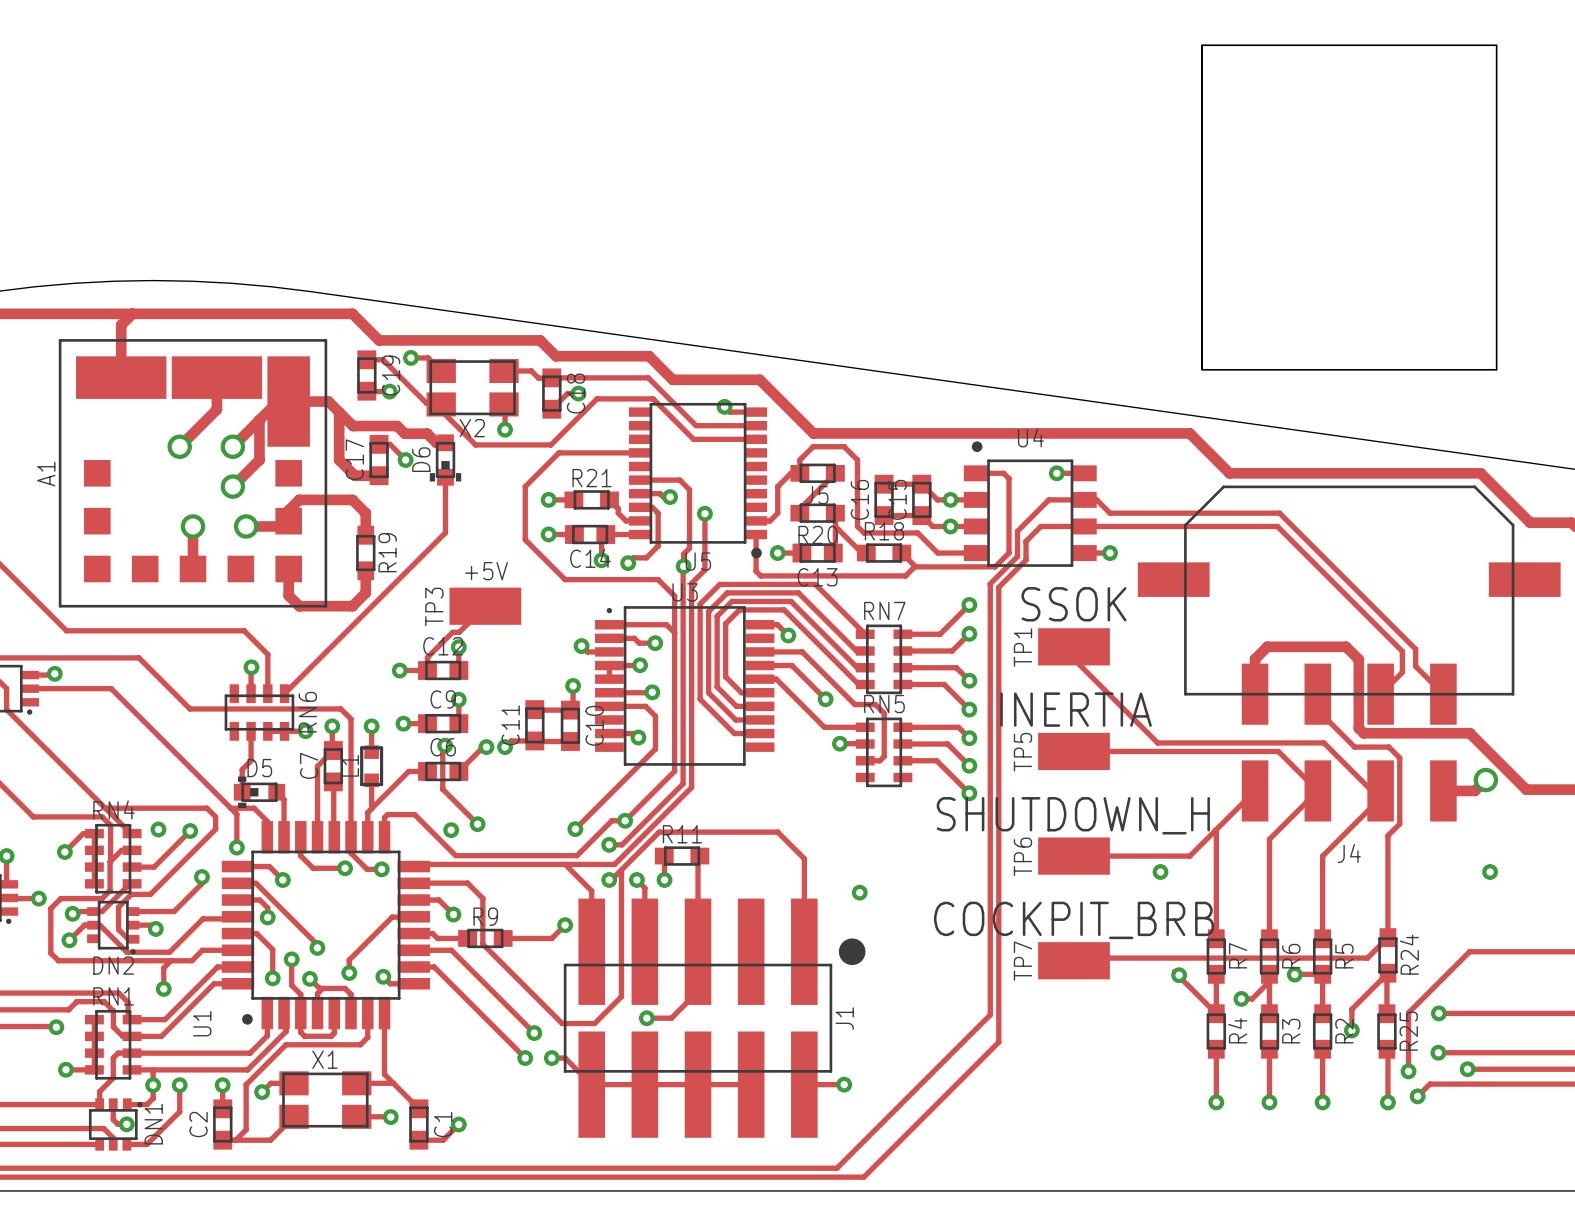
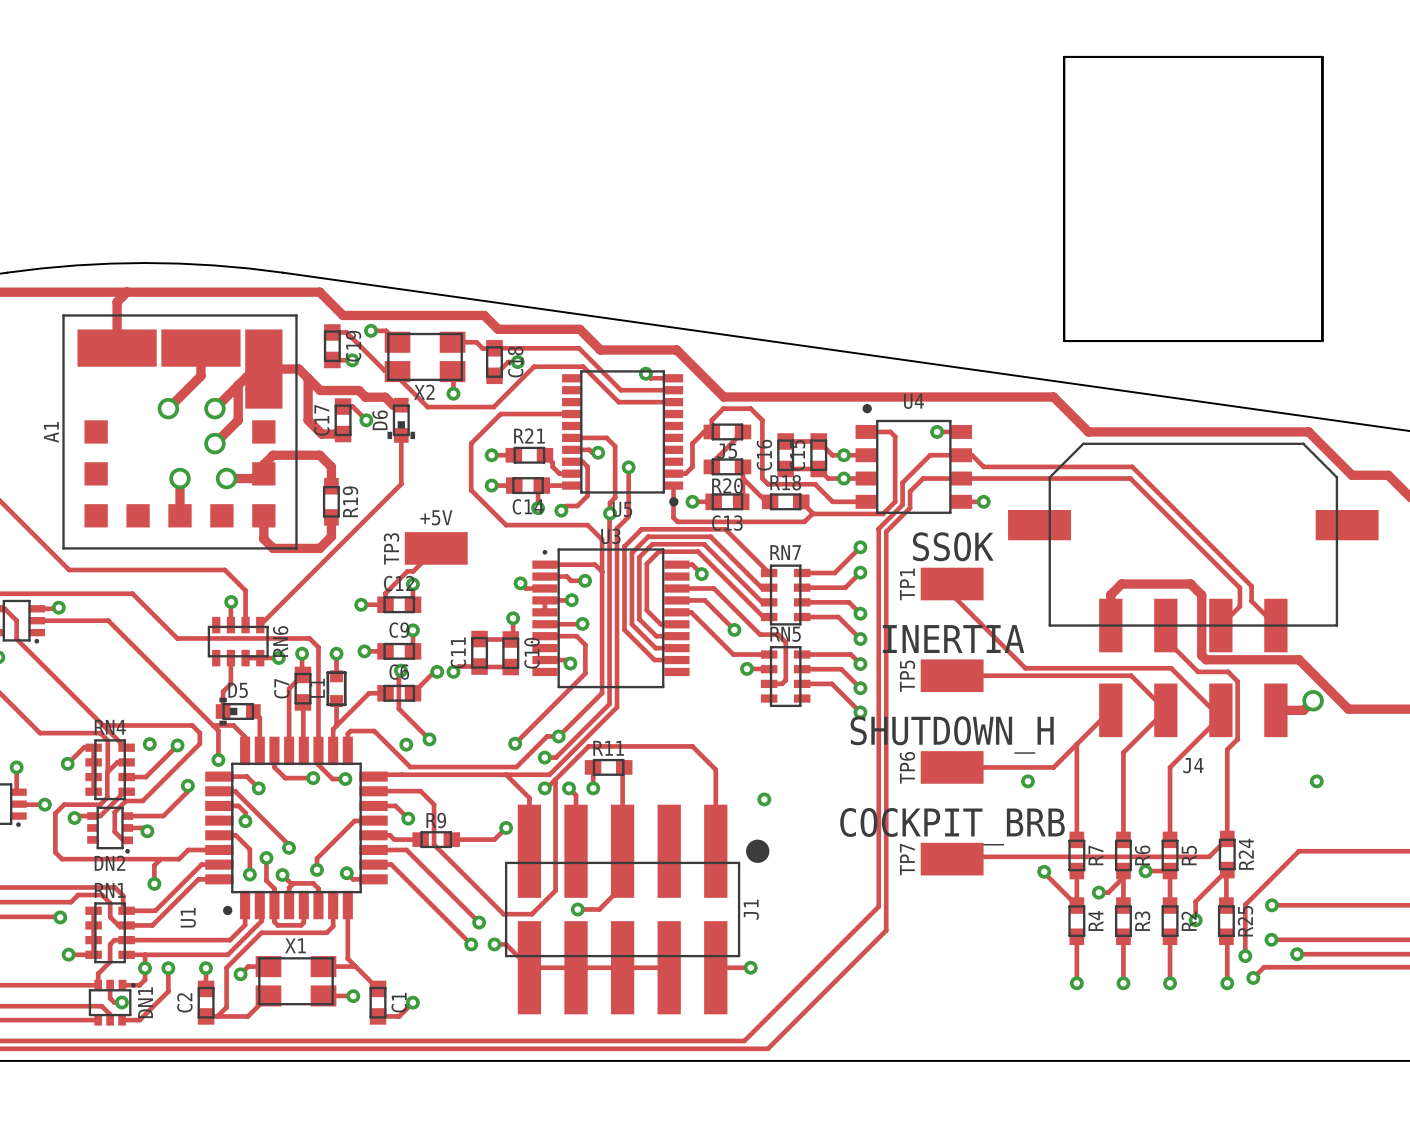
track: (238, 916) (235, 918) (203, 918) (169, 952) (127, 952) (99, 925) (84, 925) (69, 940) -> none
via: (69, 940) -> none

